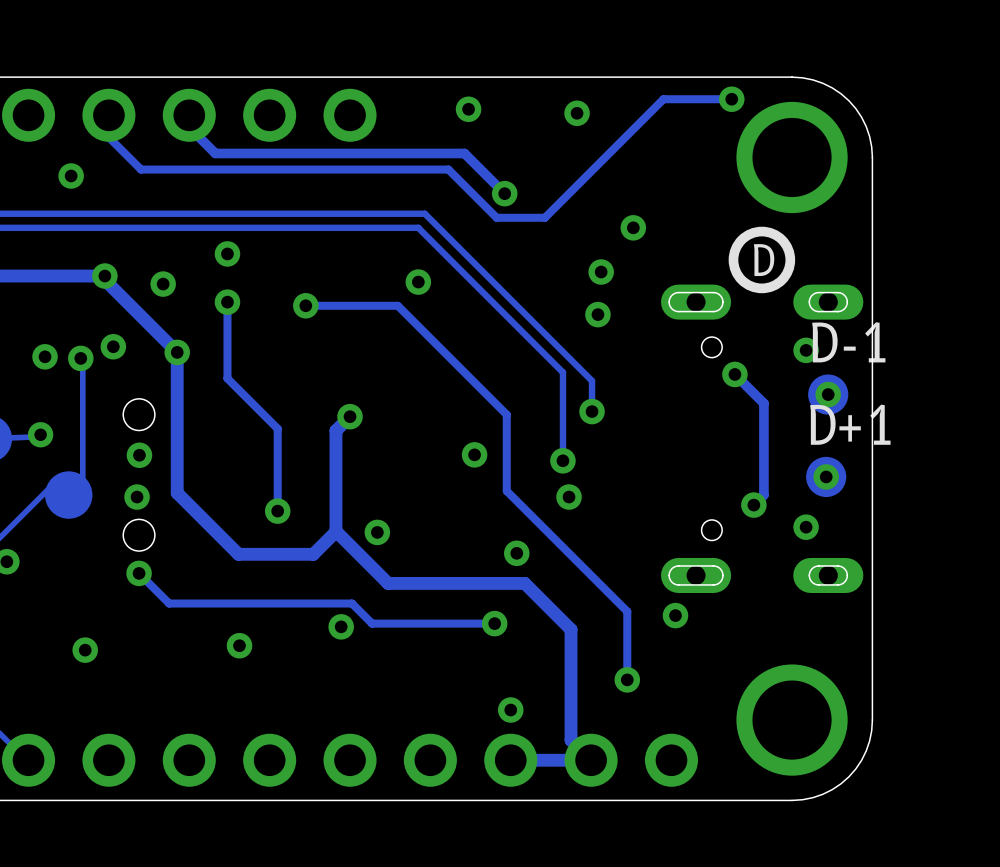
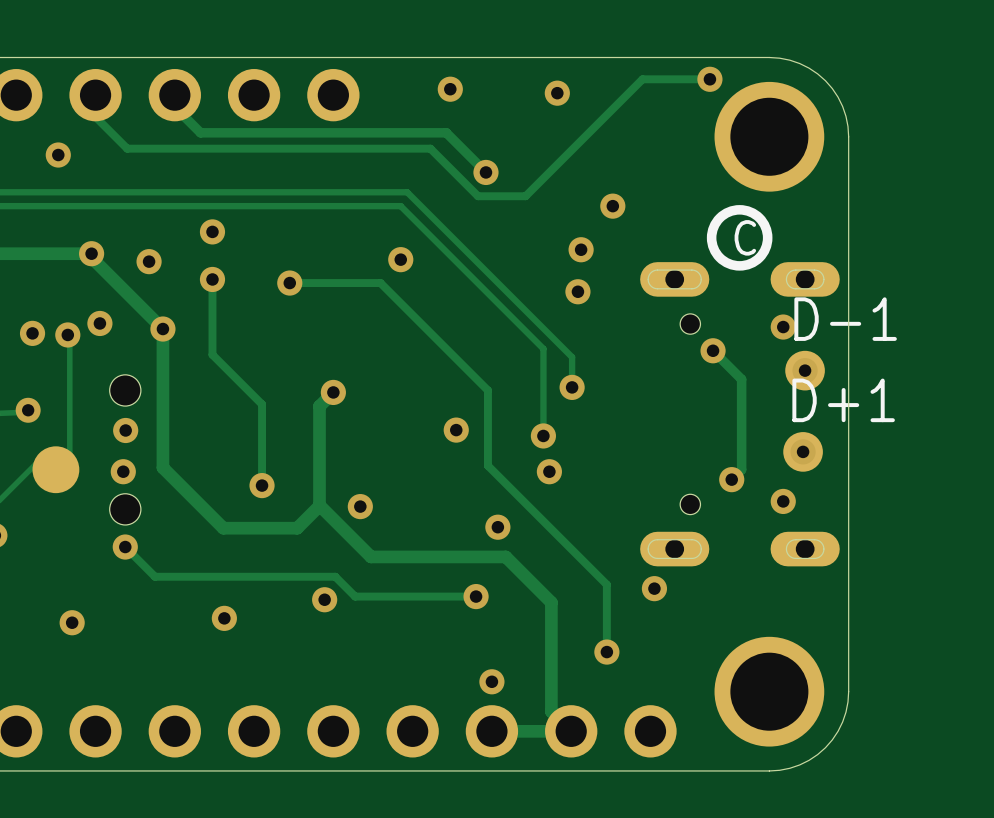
drawing shape: [728, 226, 796, 294] -> [706, 205, 773, 271]

